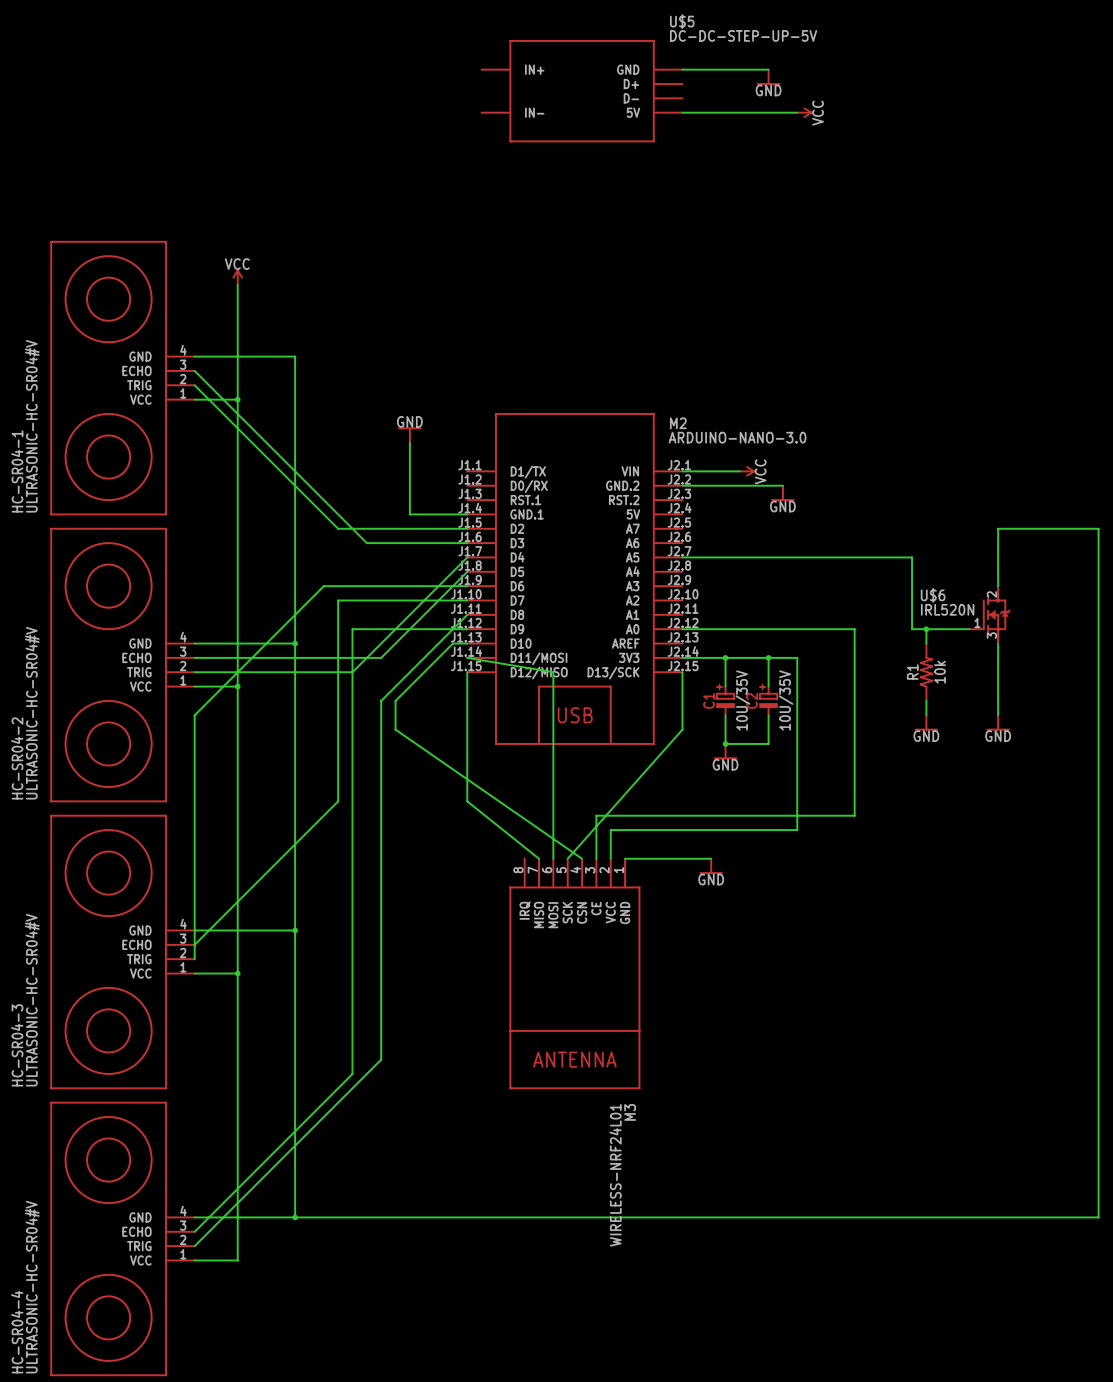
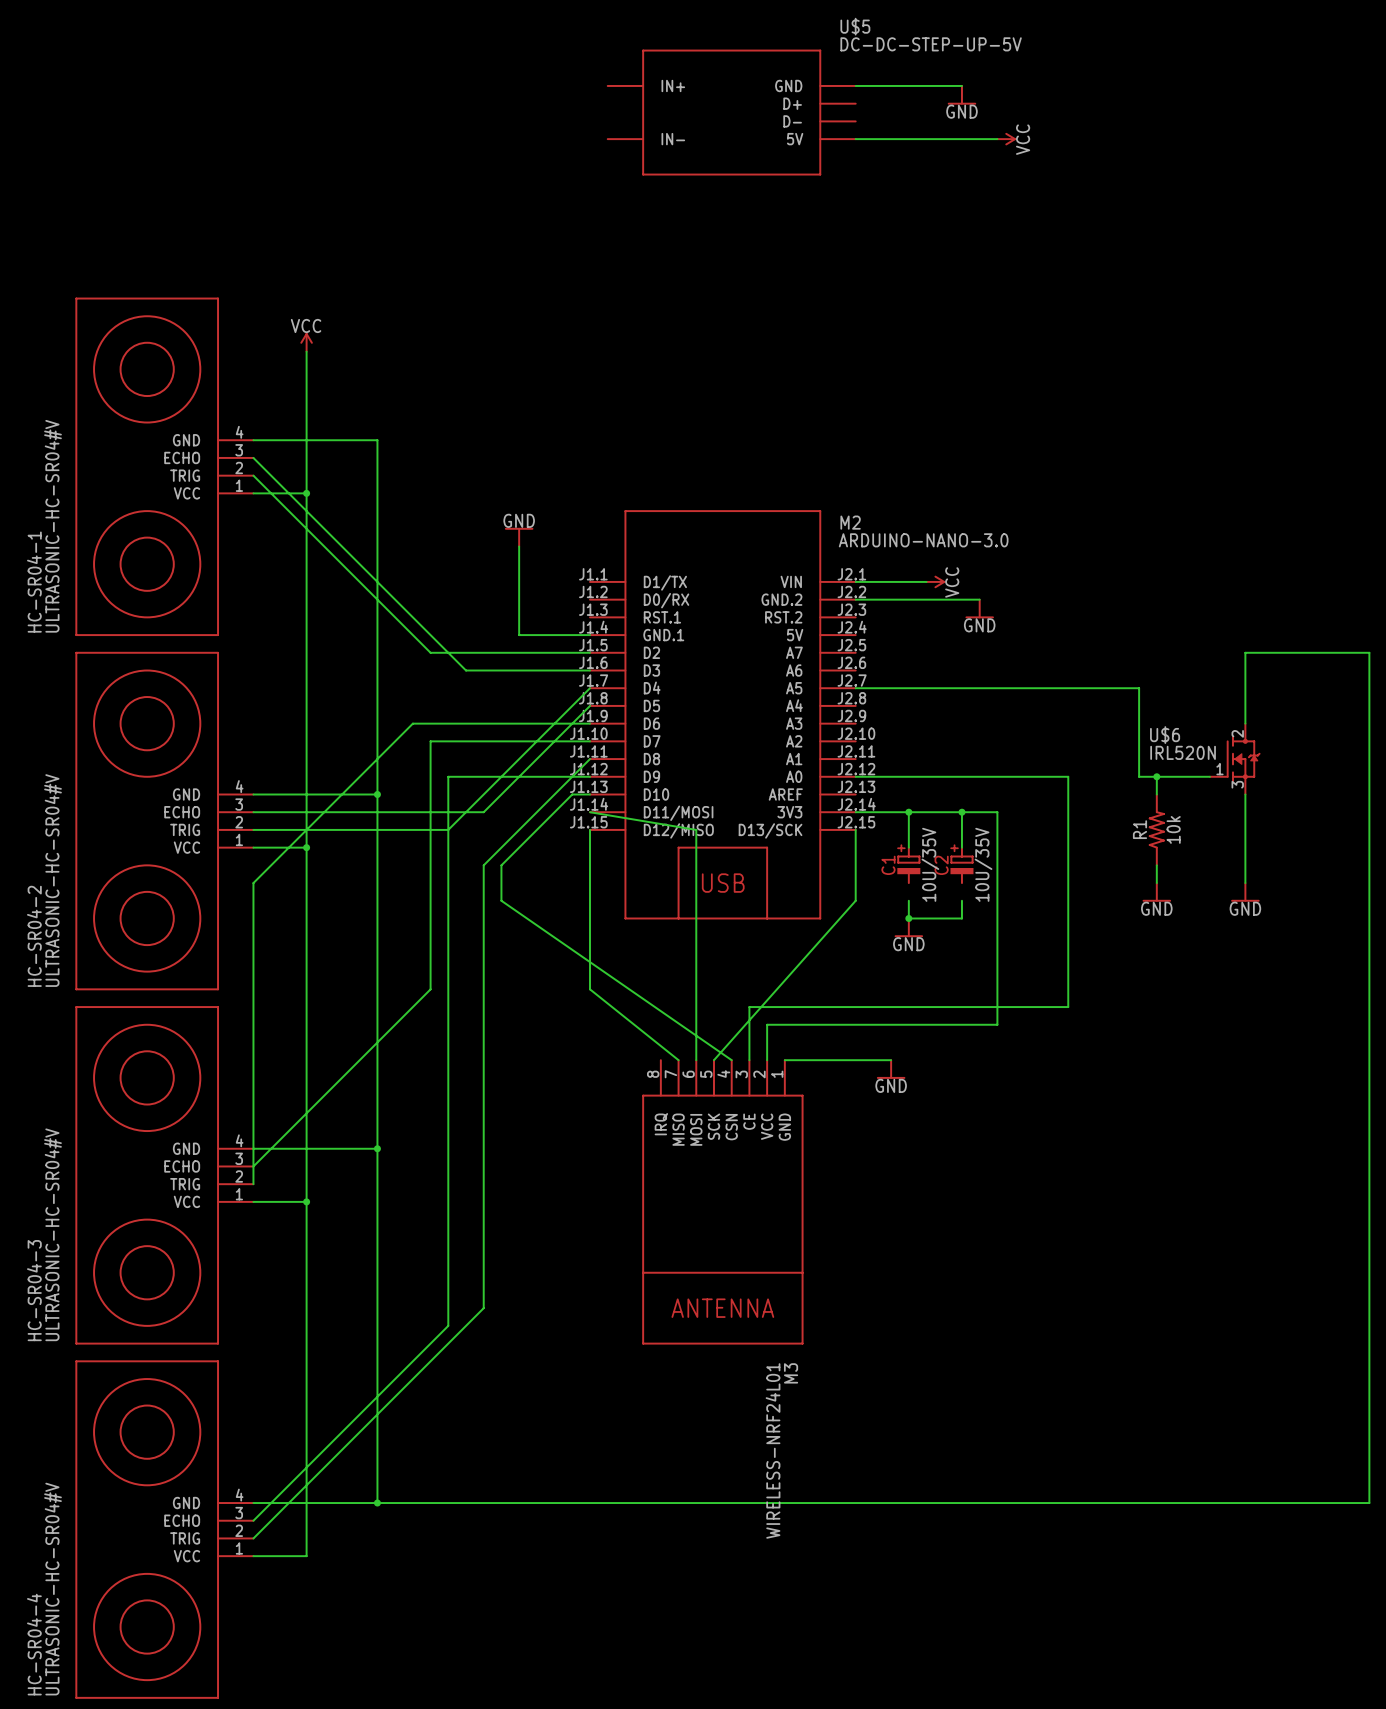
wire: (725, 715) (725, 729) -> none
wire: (768, 715) (768, 729) -> none

